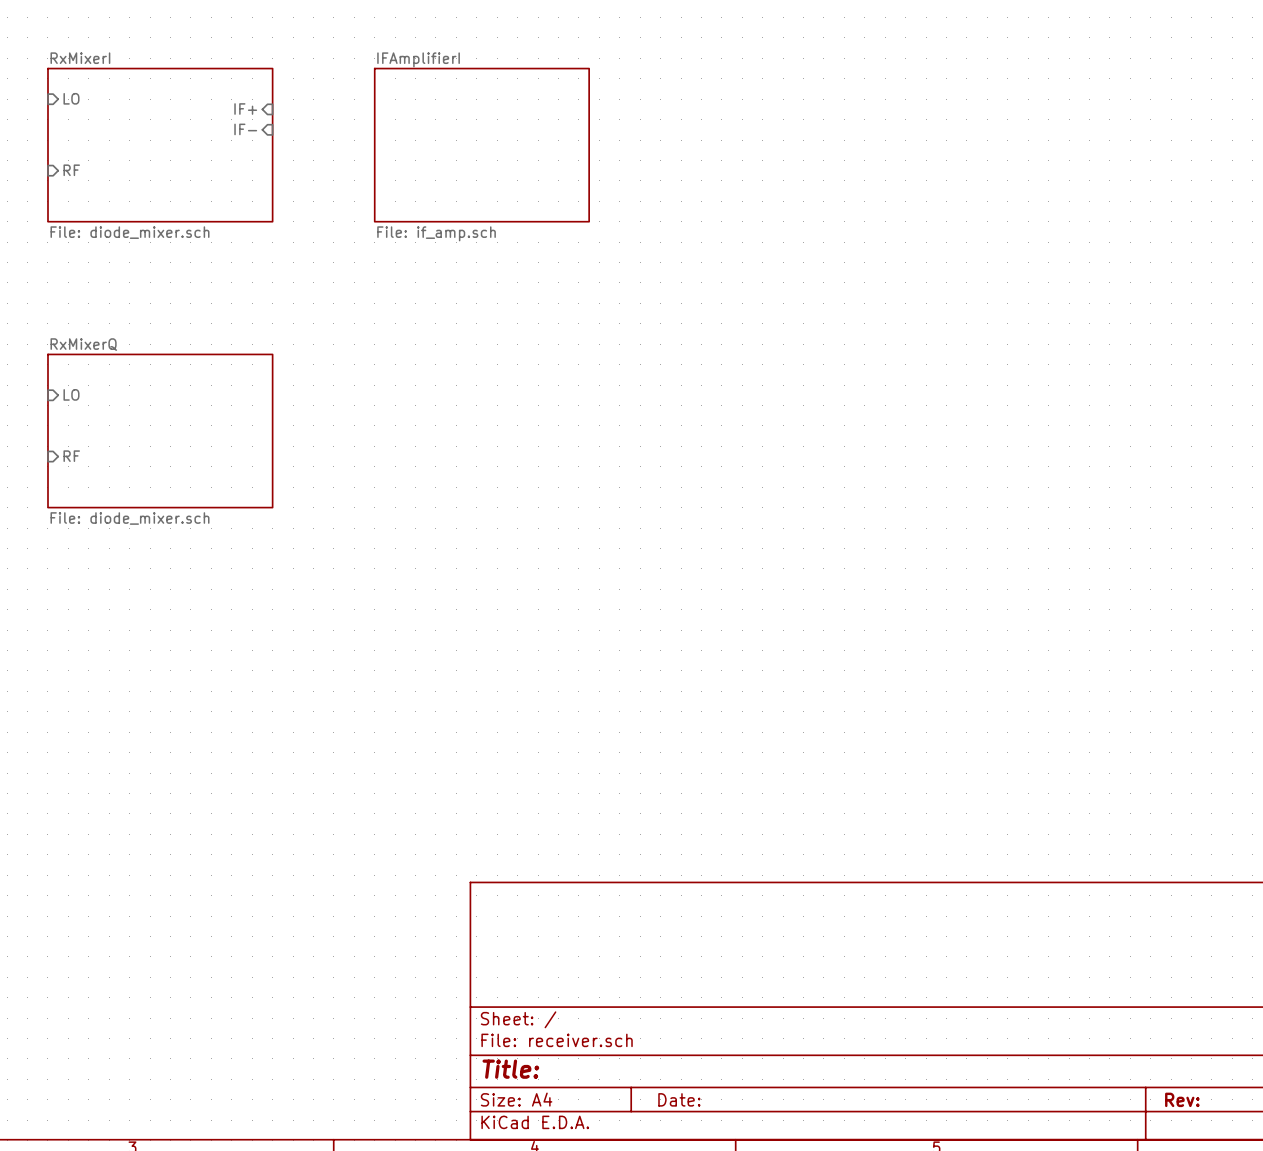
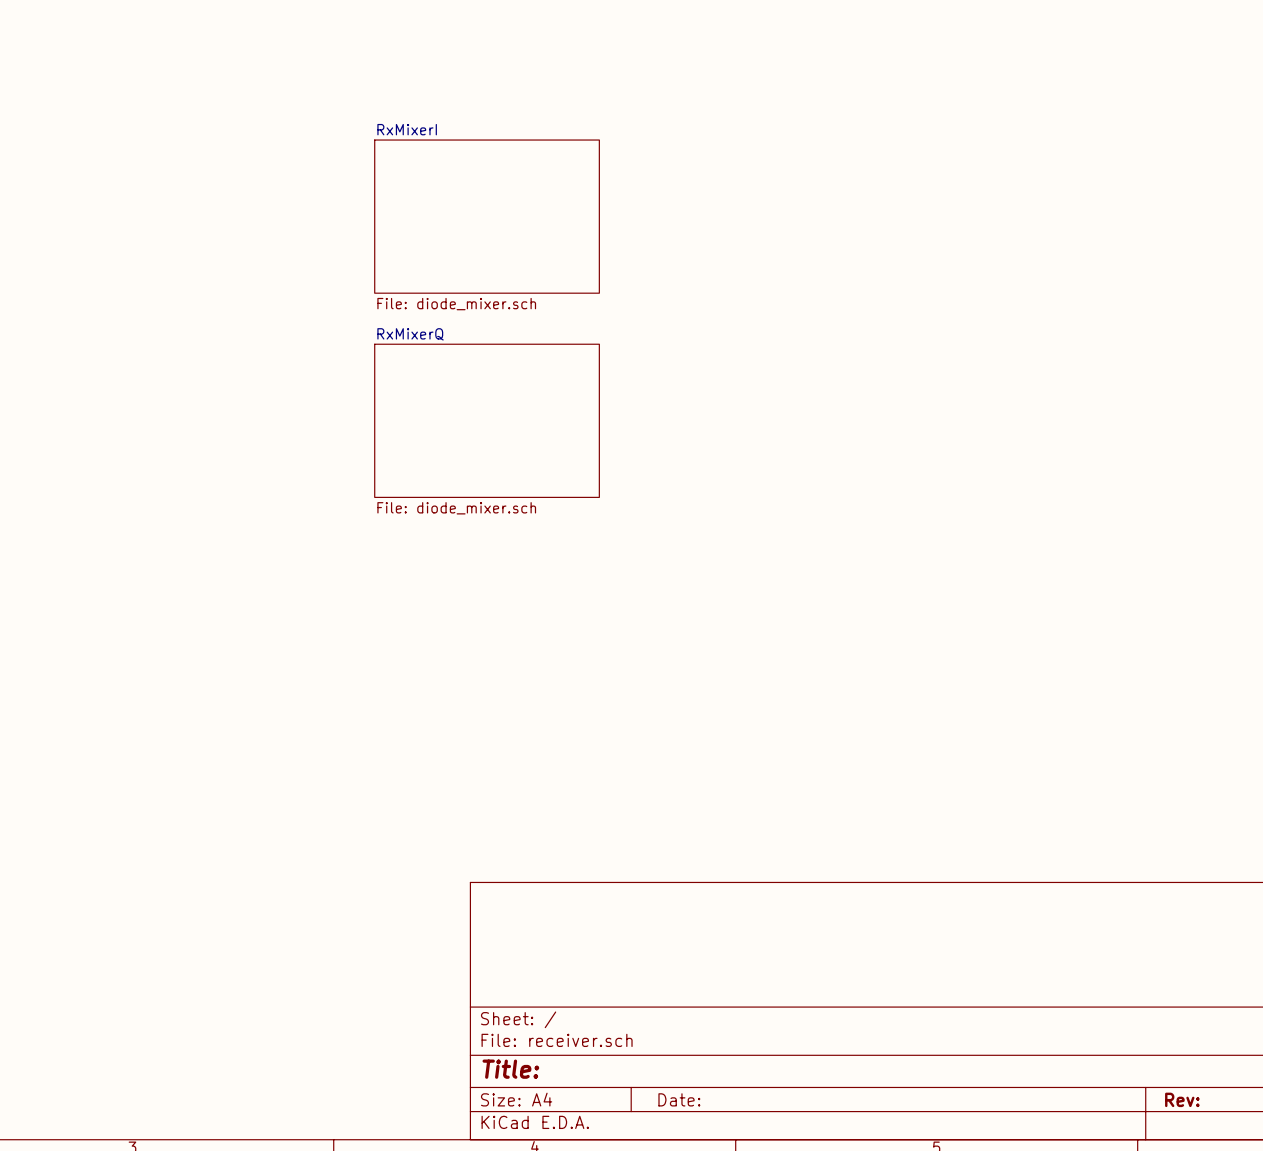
sheet pin: LO (71, 98) -> none
sheet pin: IF+ (245, 109) -> none
sheet pin: IF- (245, 129) -> none
sheet RxMixerI: File: diode_mixer.sch (160, 145) -> none
sheet IFAmplifierI: File: if_amp.sch (481, 145) -> none
sheet pin: RF (71, 170) -> none
sheet RxMixerI: none -> File: diode_mixer.sch (487, 216)
sheet pin: LO (71, 394) -> none
sheet RxMixerQ: none -> File: diode_mixer.sch (487, 420)
sheet RxMixerQ: File: diode_mixer.sch (160, 431) -> none
sheet pin: RF (71, 456) -> none

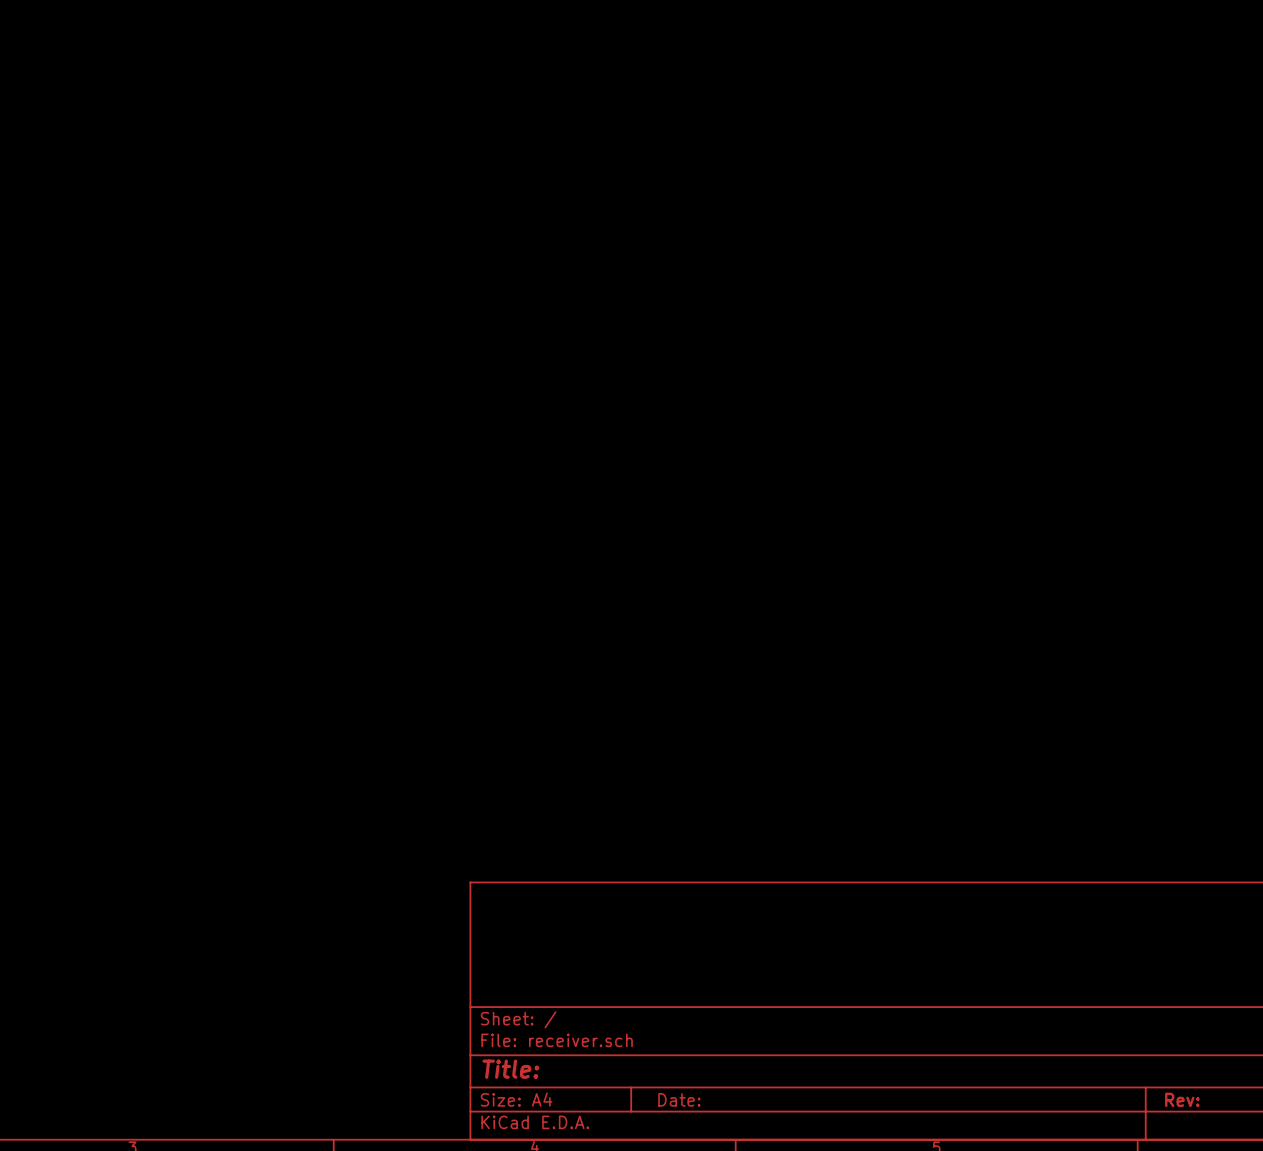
sheet RxMixerI: File: diode_mixer.sch (487, 216) -> none
sheet RxMixerQ: File: diode_mixer.sch (487, 420) -> none

